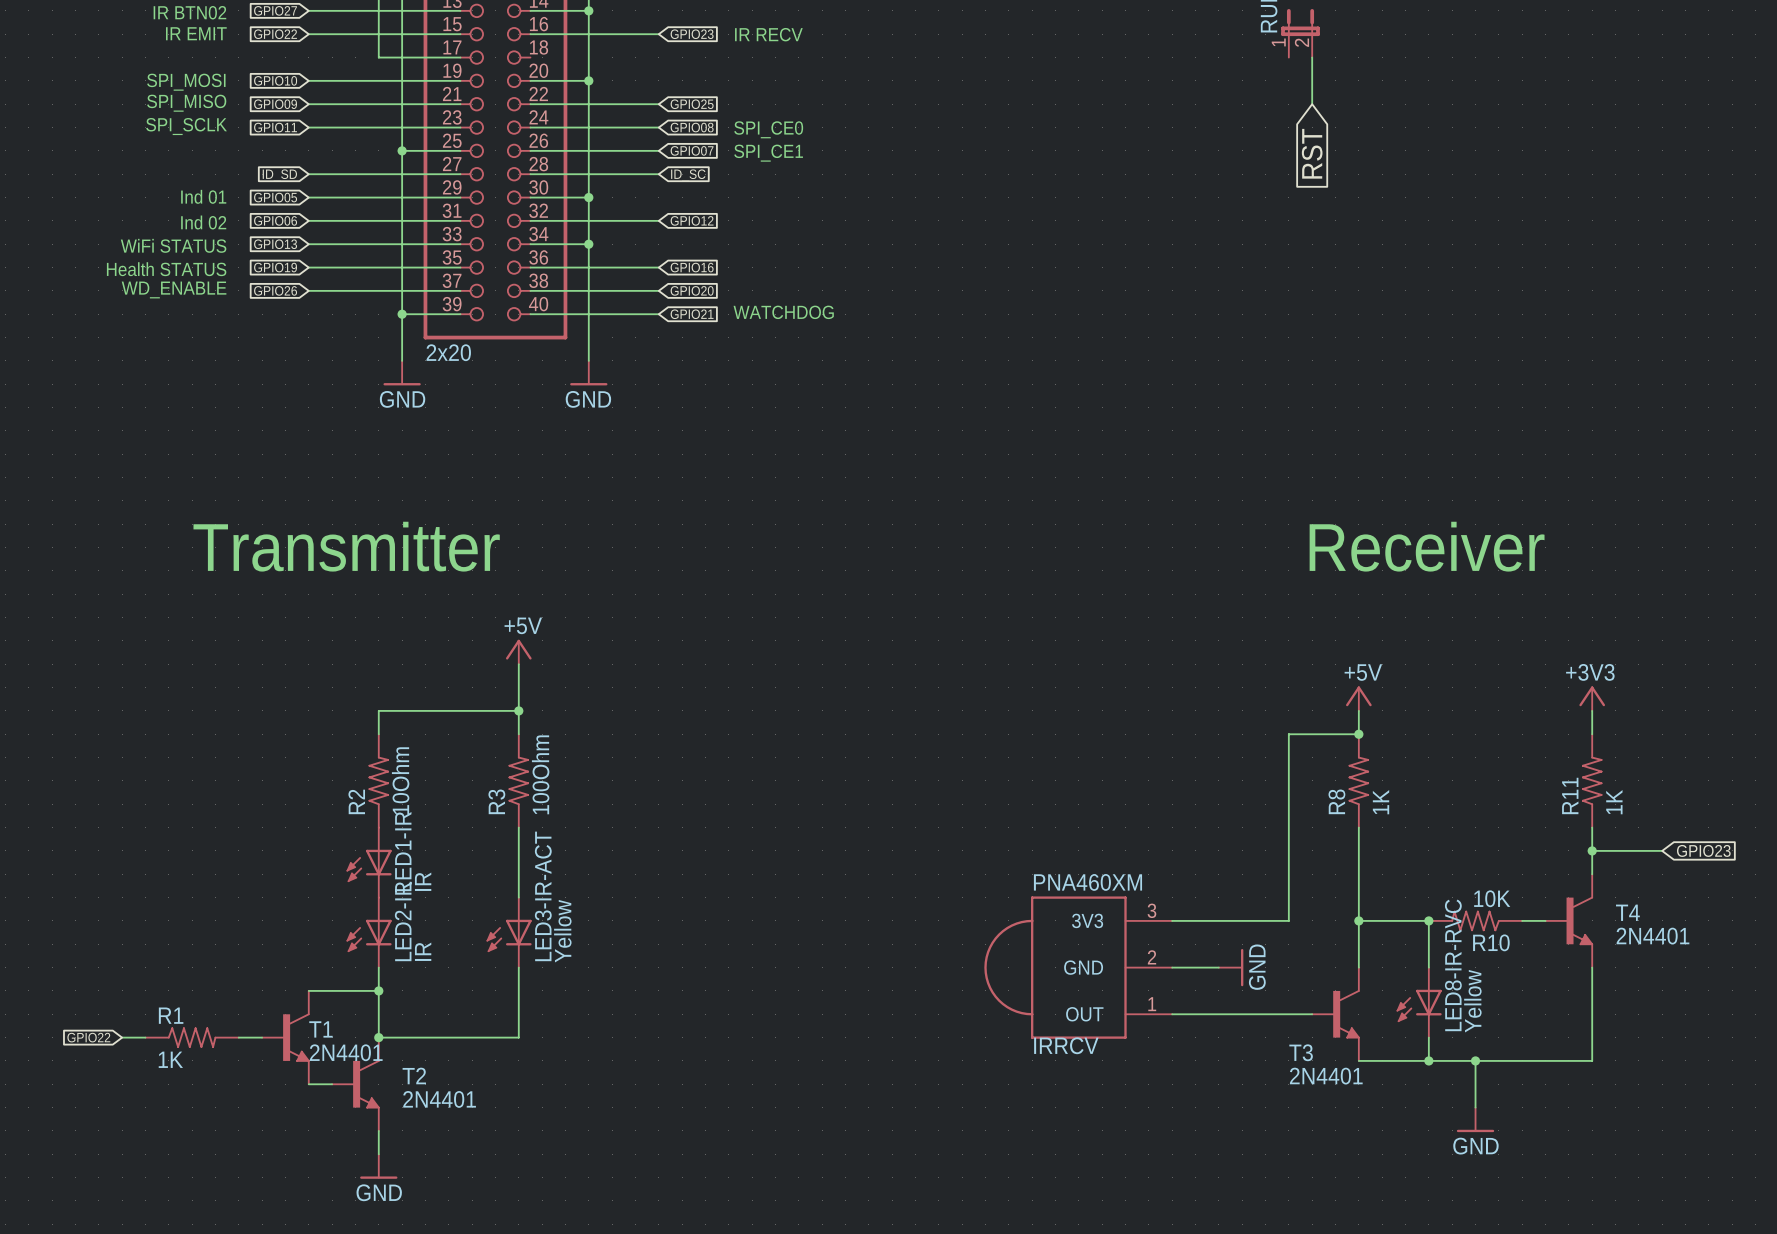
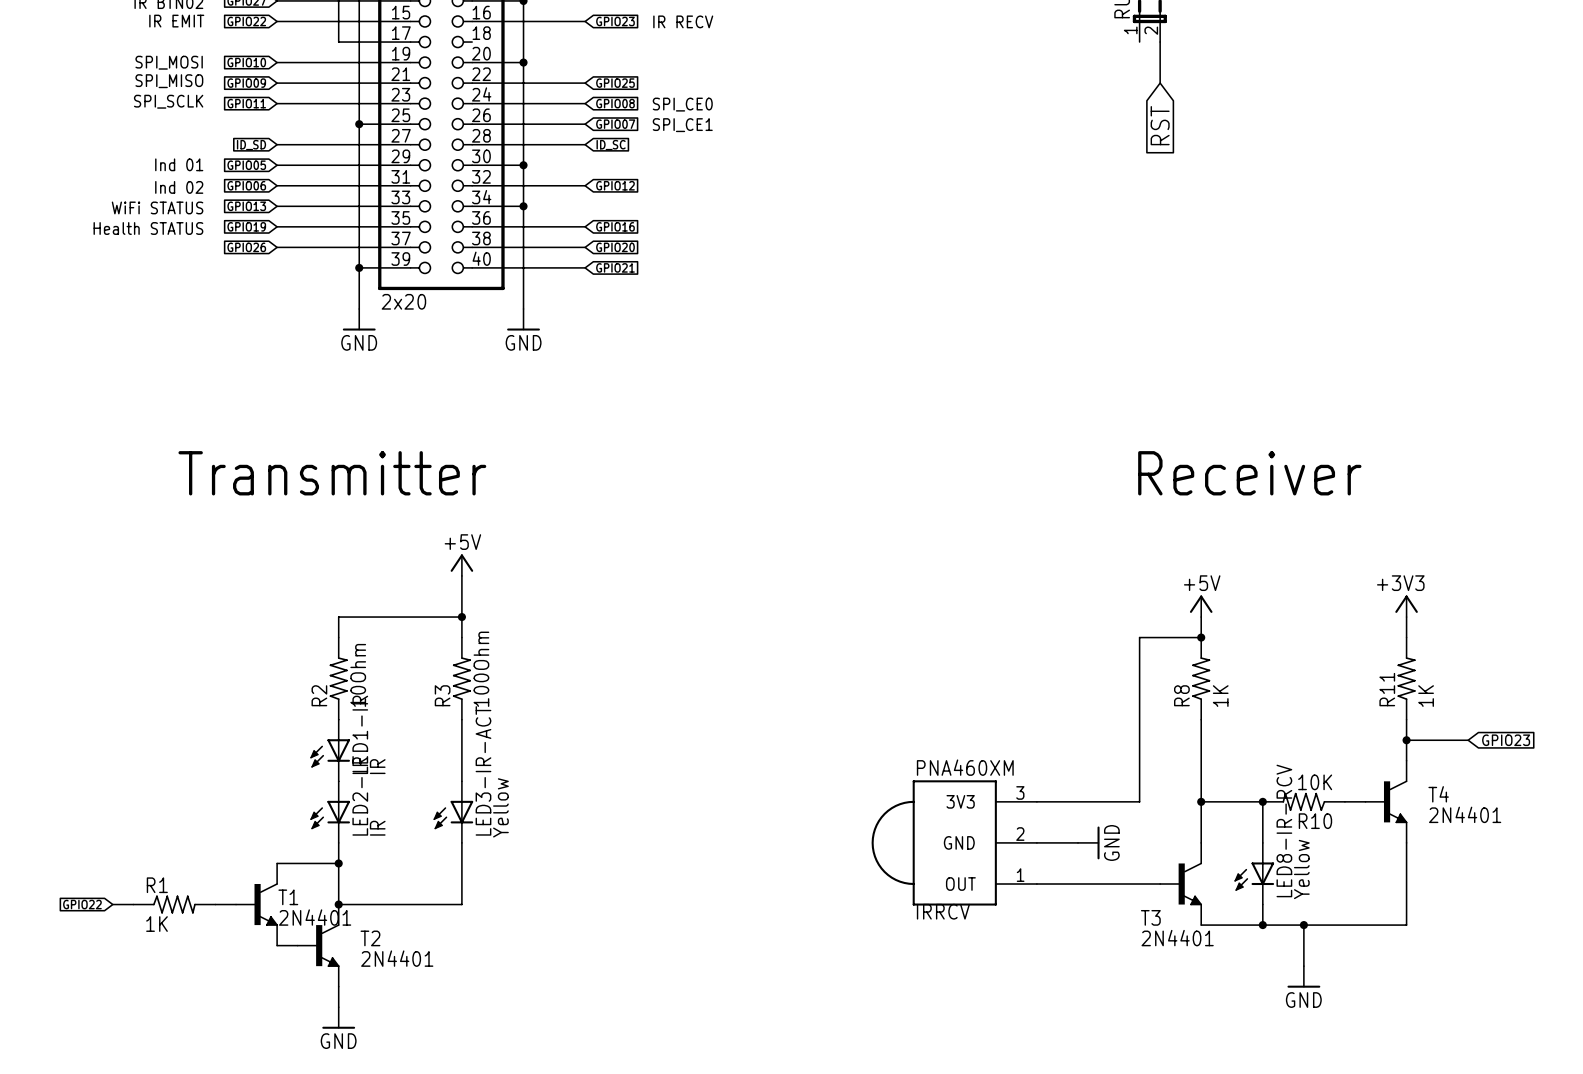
text: WD_ENABLE (174, 289) -> none
text: WATCHDOG (783, 312) -> none
LED8-IR-RVC name: LED8-IR-RVC (1453, 965) -> LED8-IR-RCV (1284, 830)

